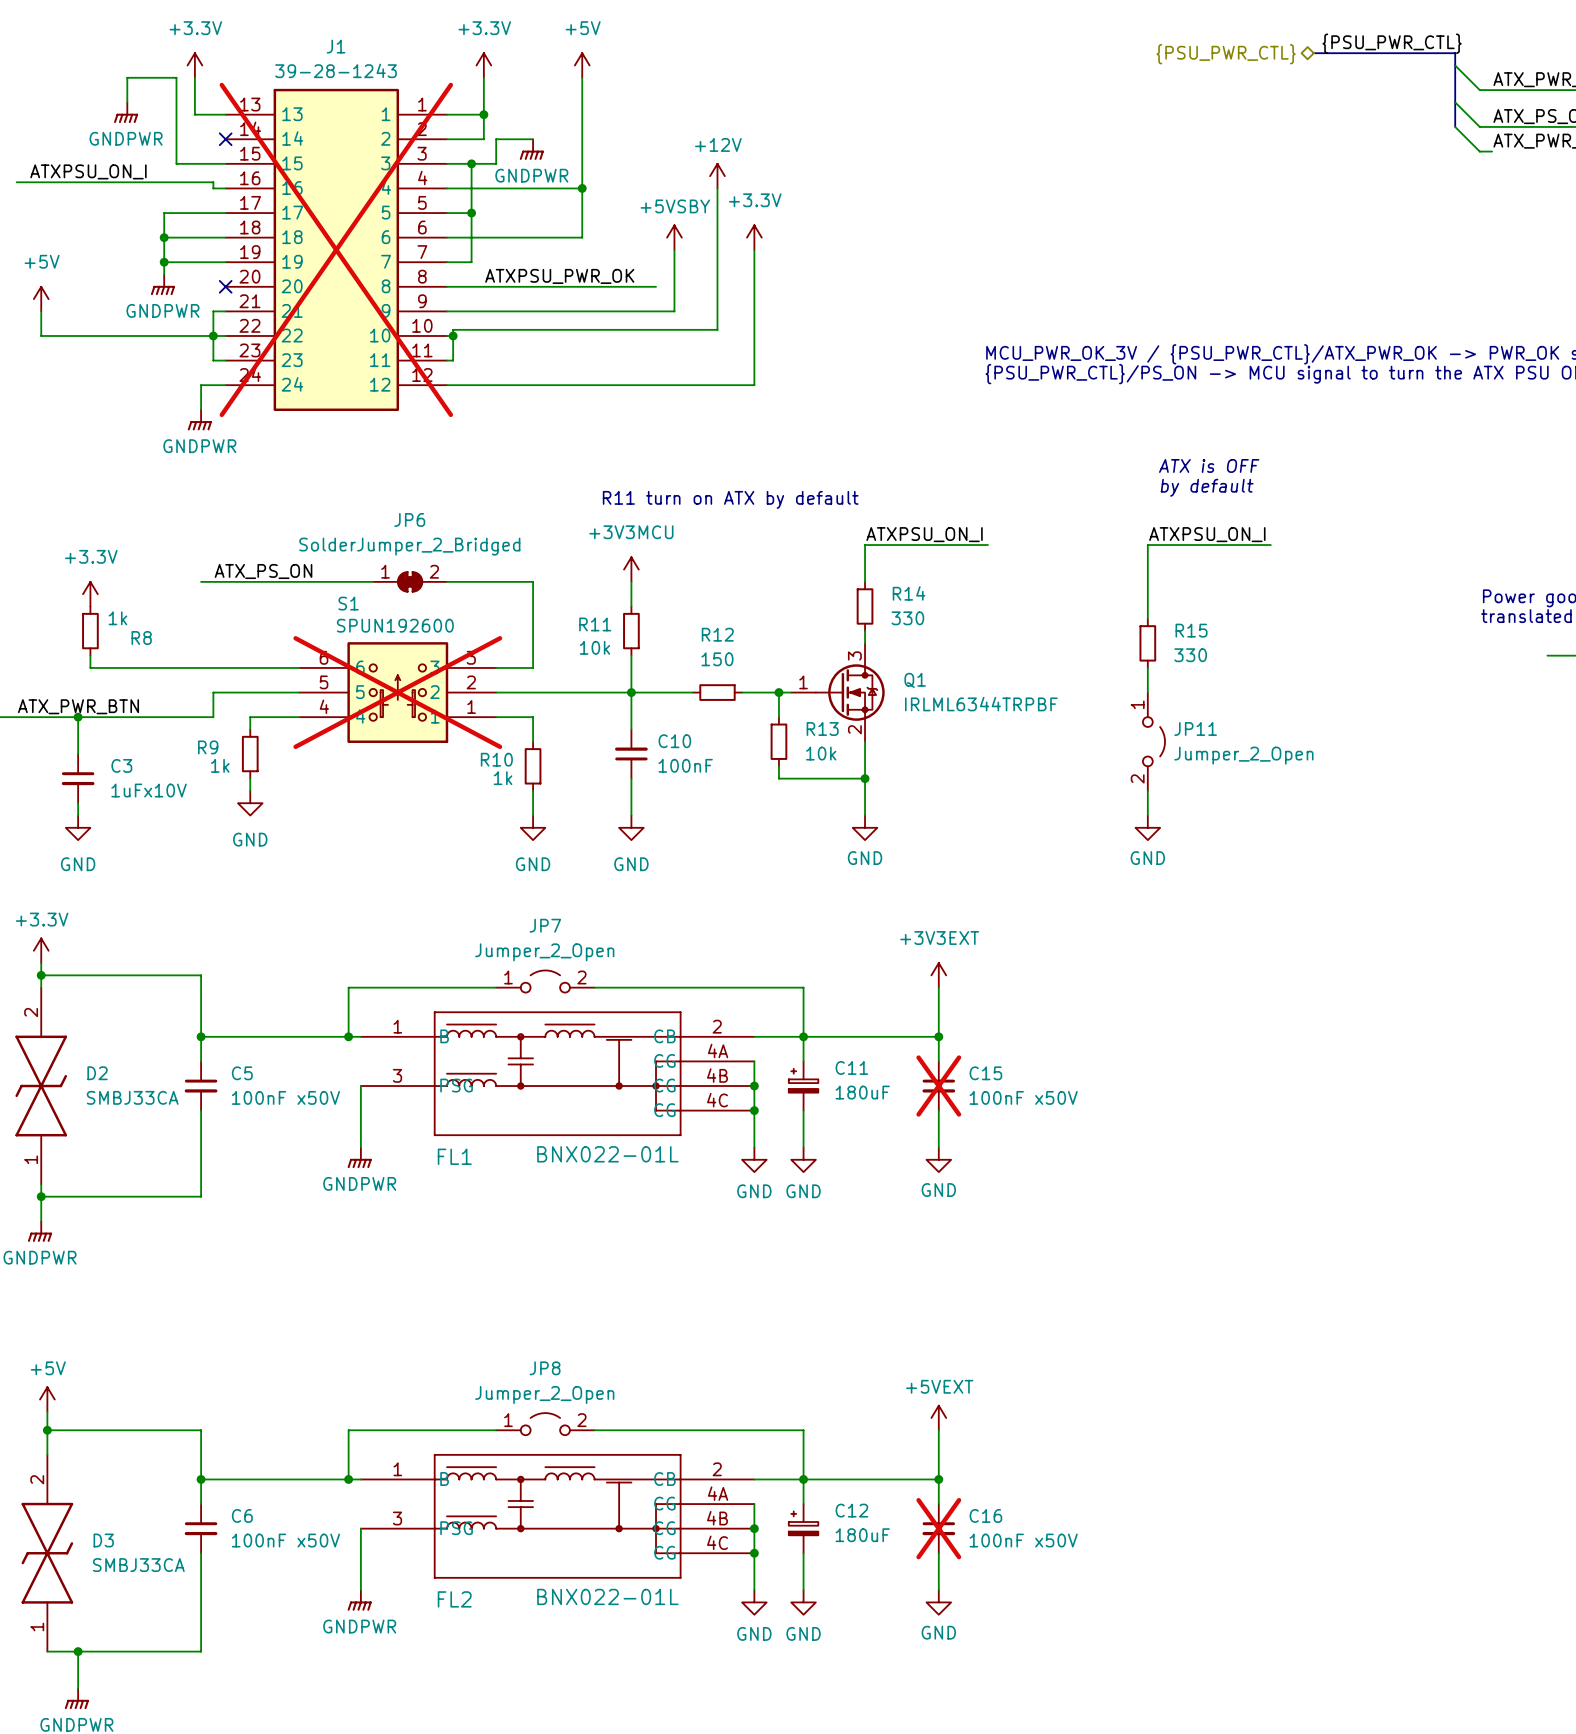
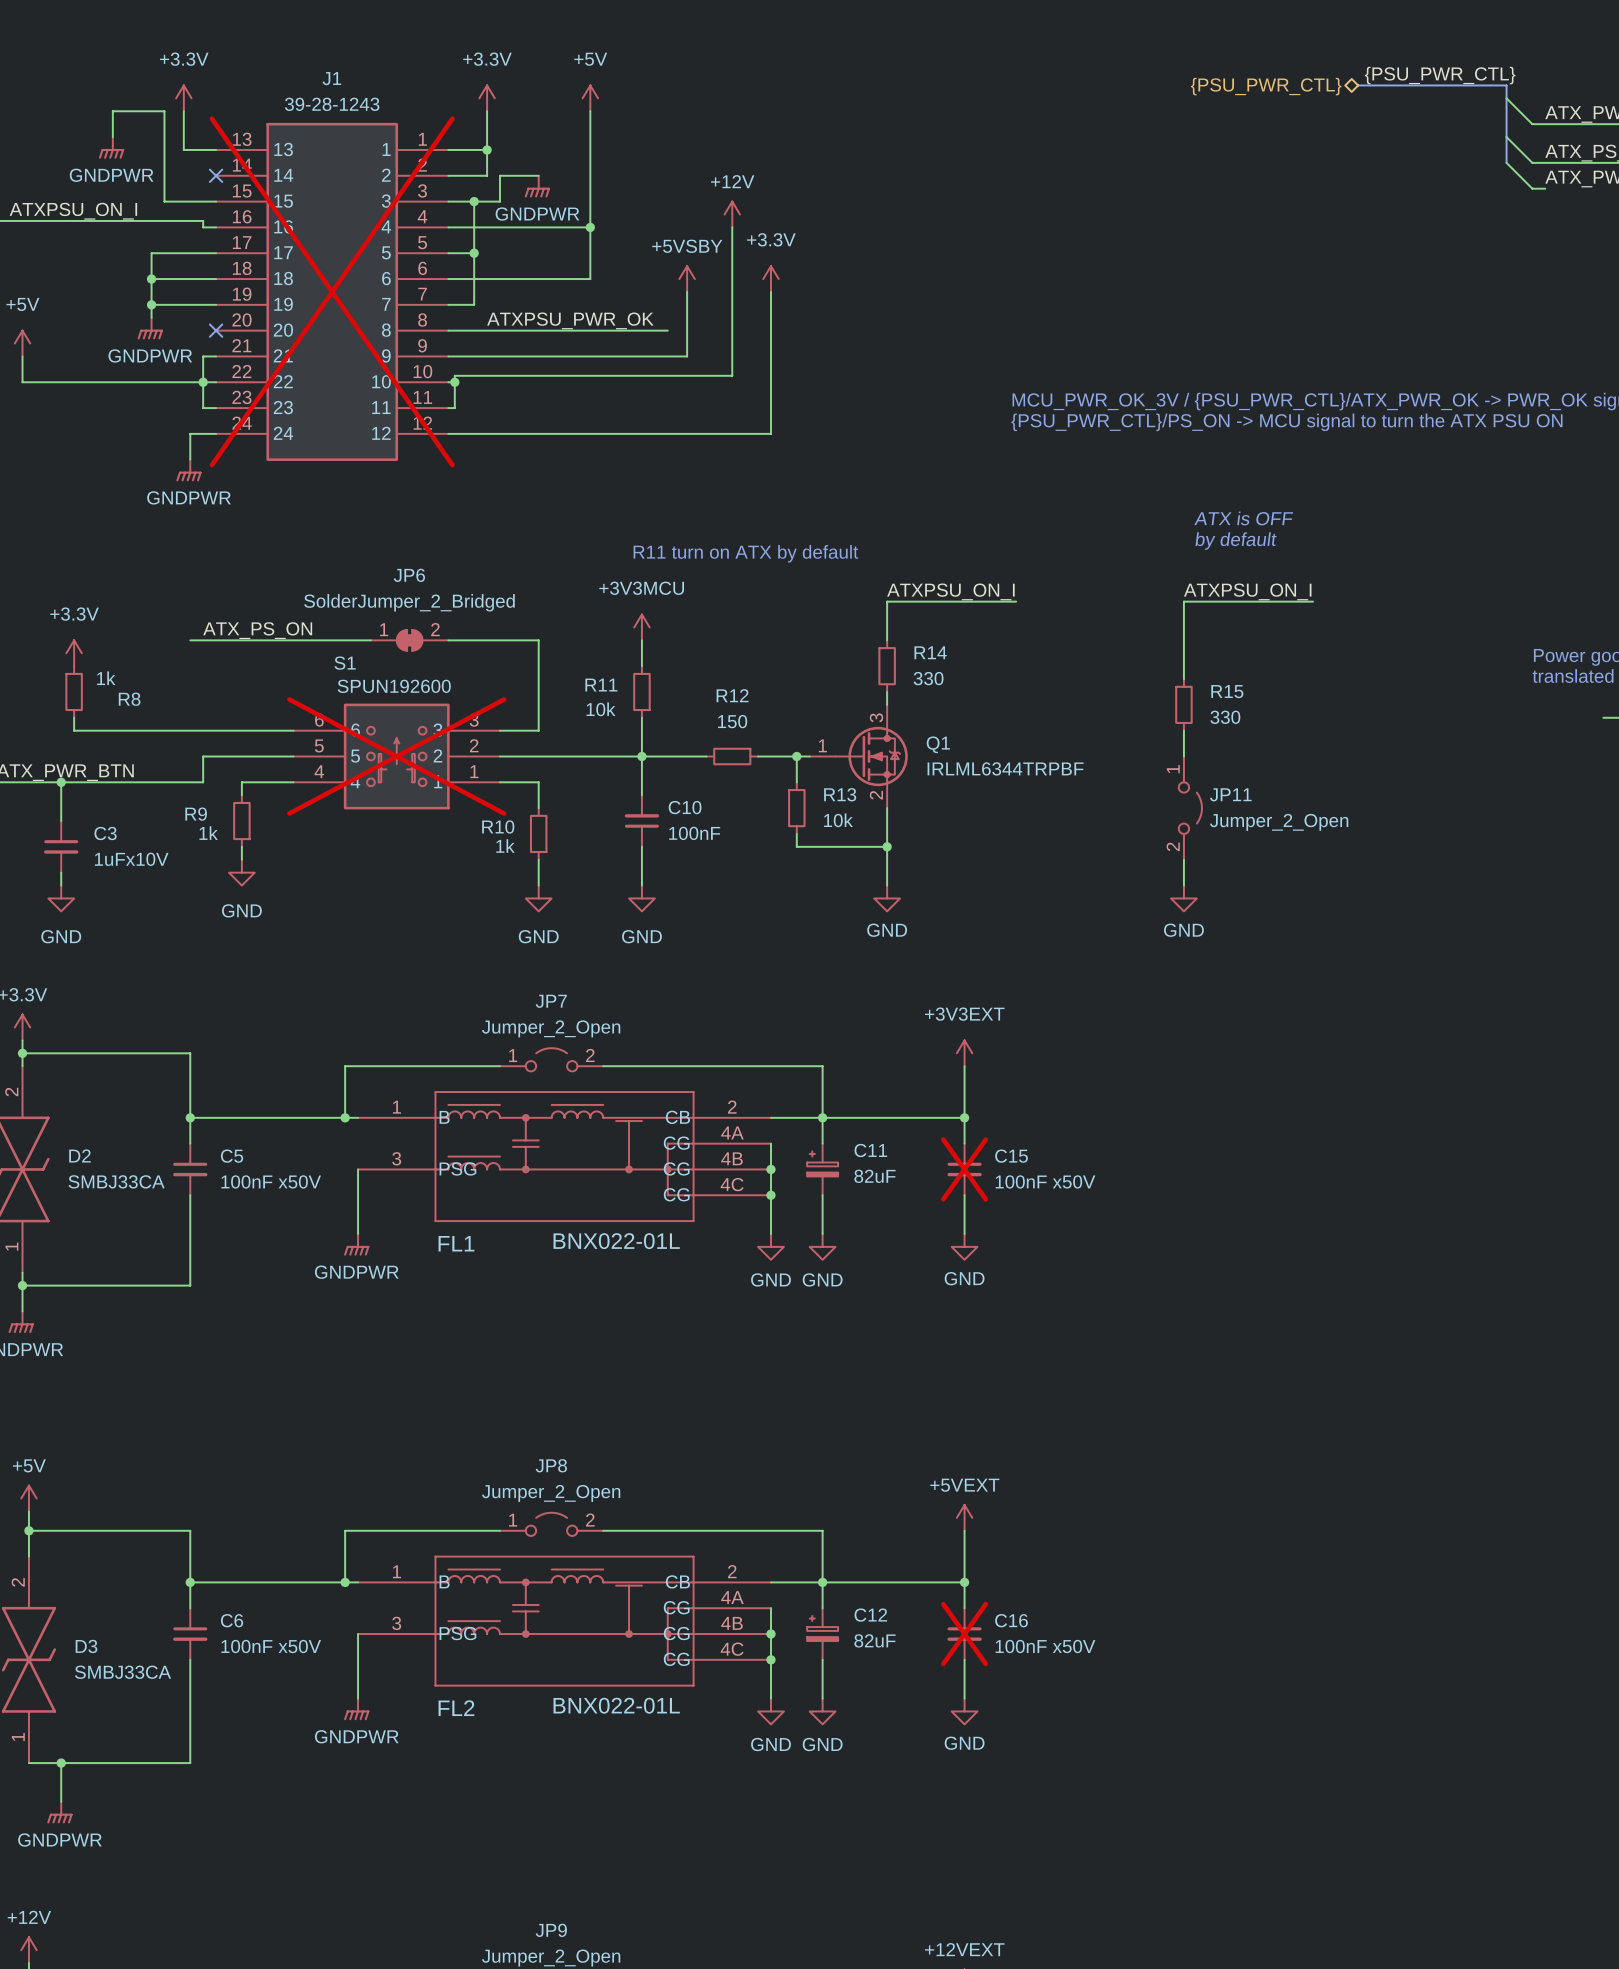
C11 value: 180uF (862, 1092) -> 82uF (874, 1176)
C12 value: 180uF (862, 1535) -> 82uF (874, 1640)

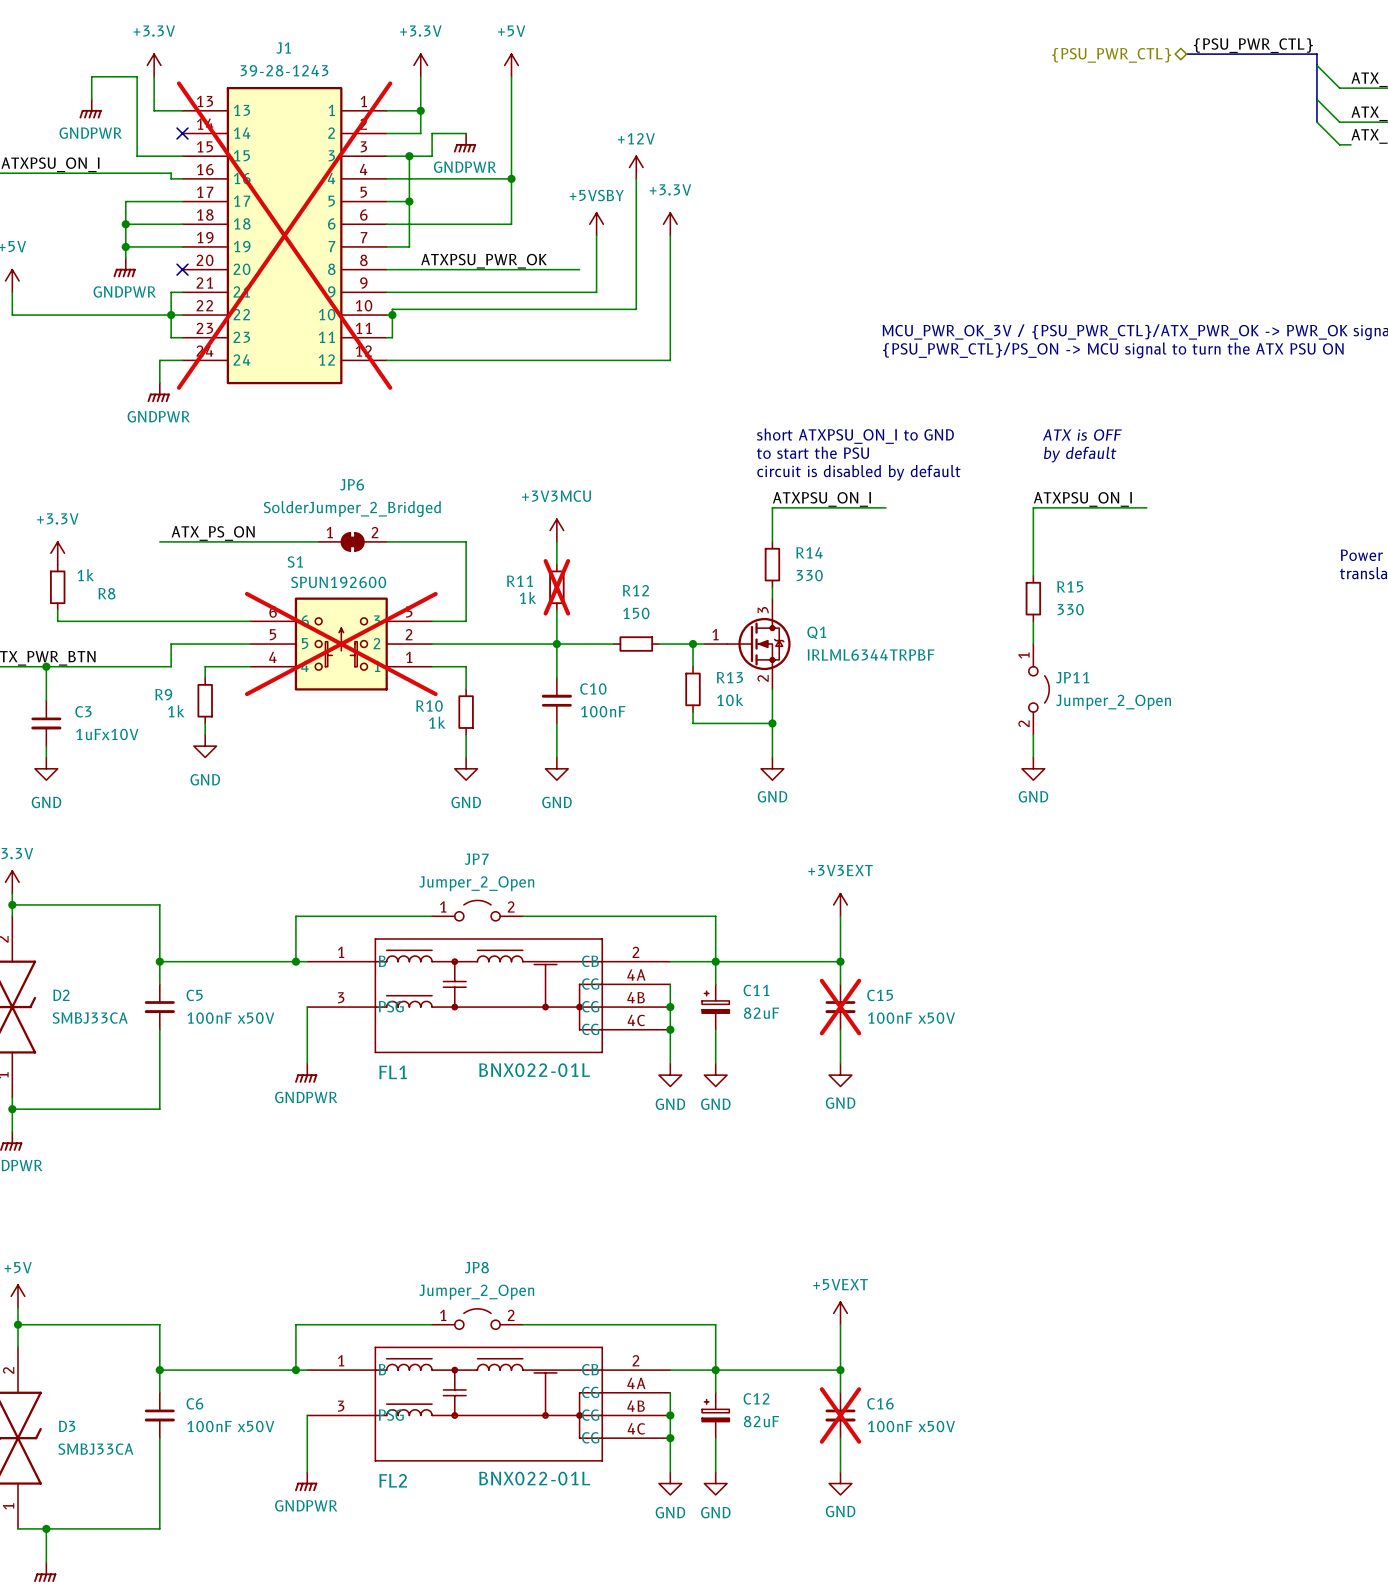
text: none -> short ATXPSU_ON_I to GND (855, 436)
text: none -> to start the PSU (812, 452)
text: R11 turn on ATX by default (745, 553) -> none
text: none -> circuit is disabled by default (858, 472)
R11 do-not-place cross: none -> (556, 587)
R11 value: 10k (601, 709) -> 1k (527, 597)

